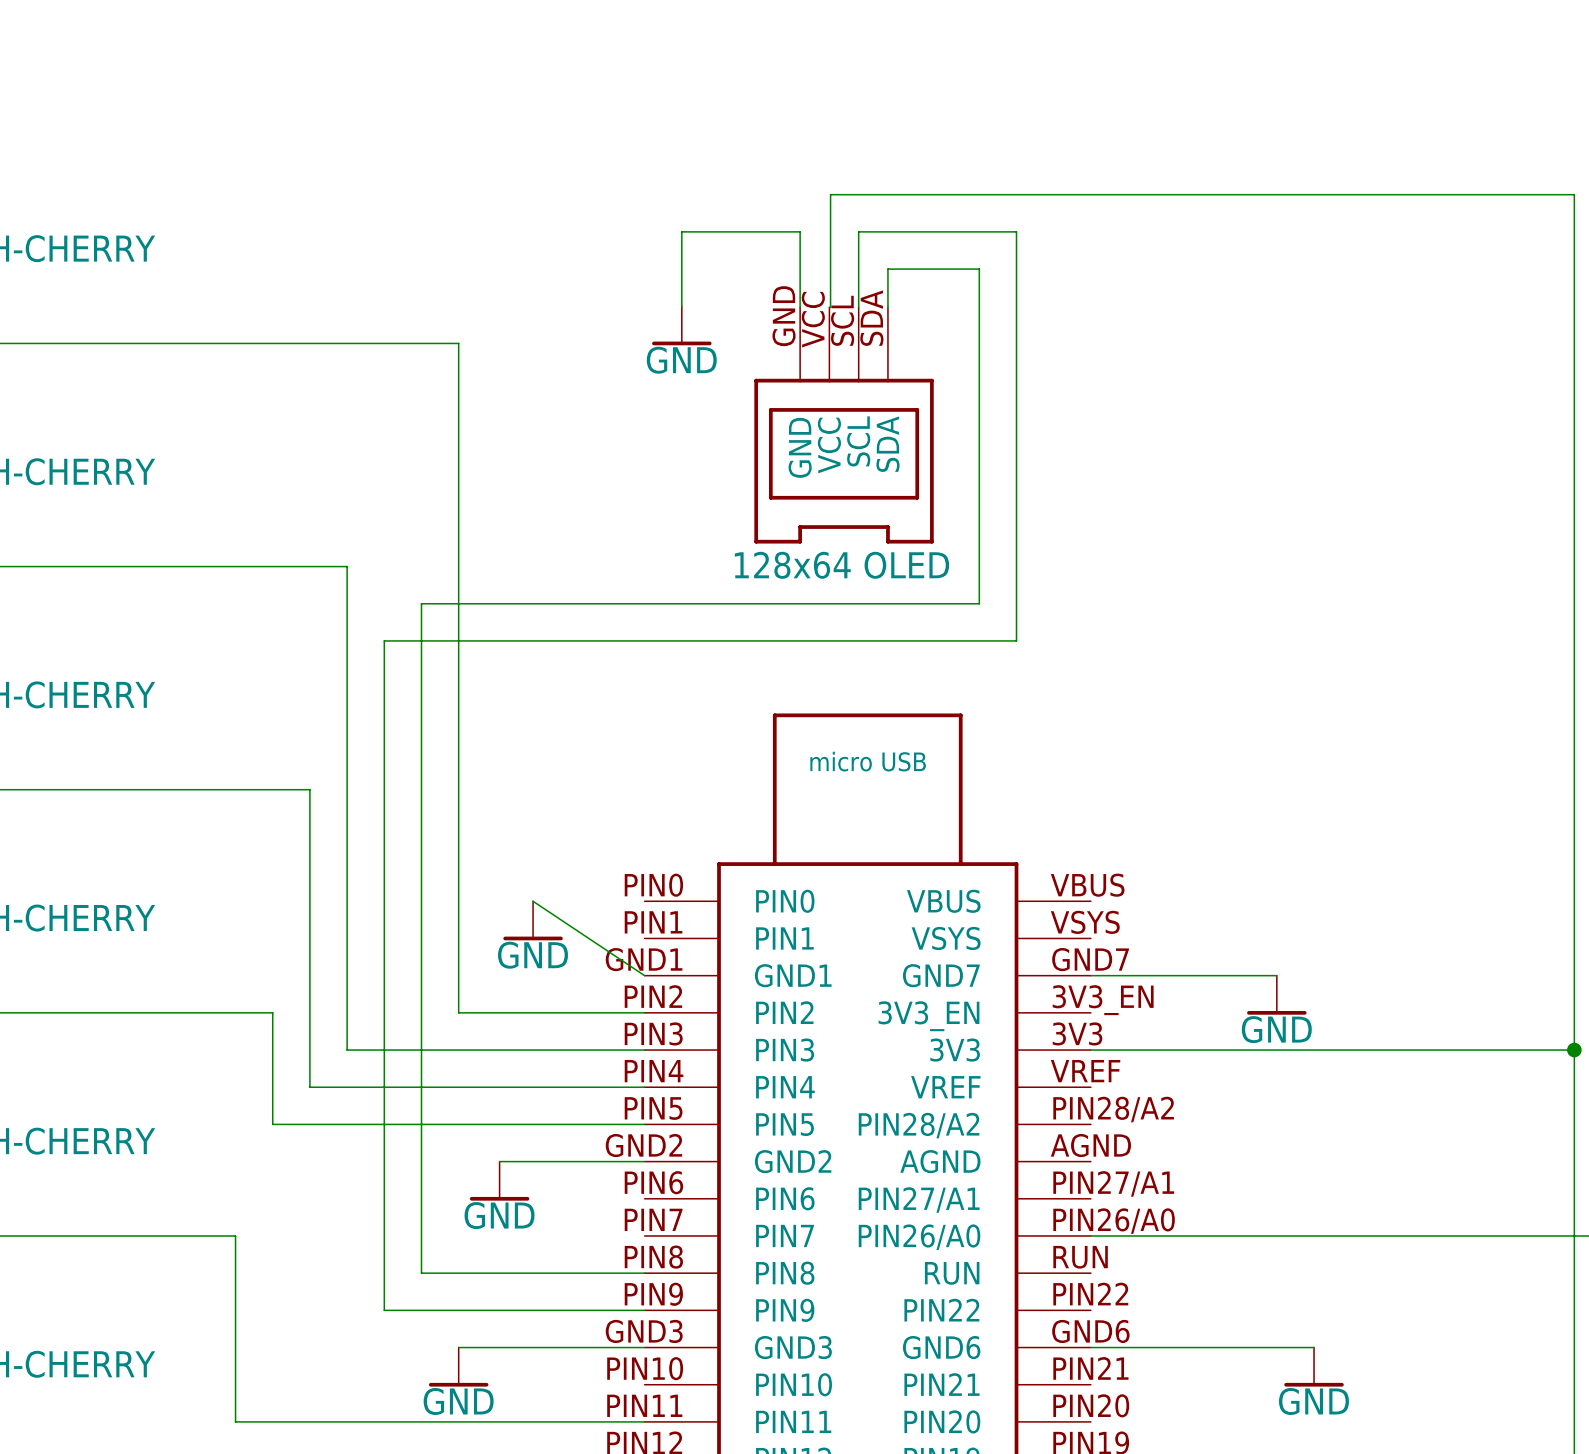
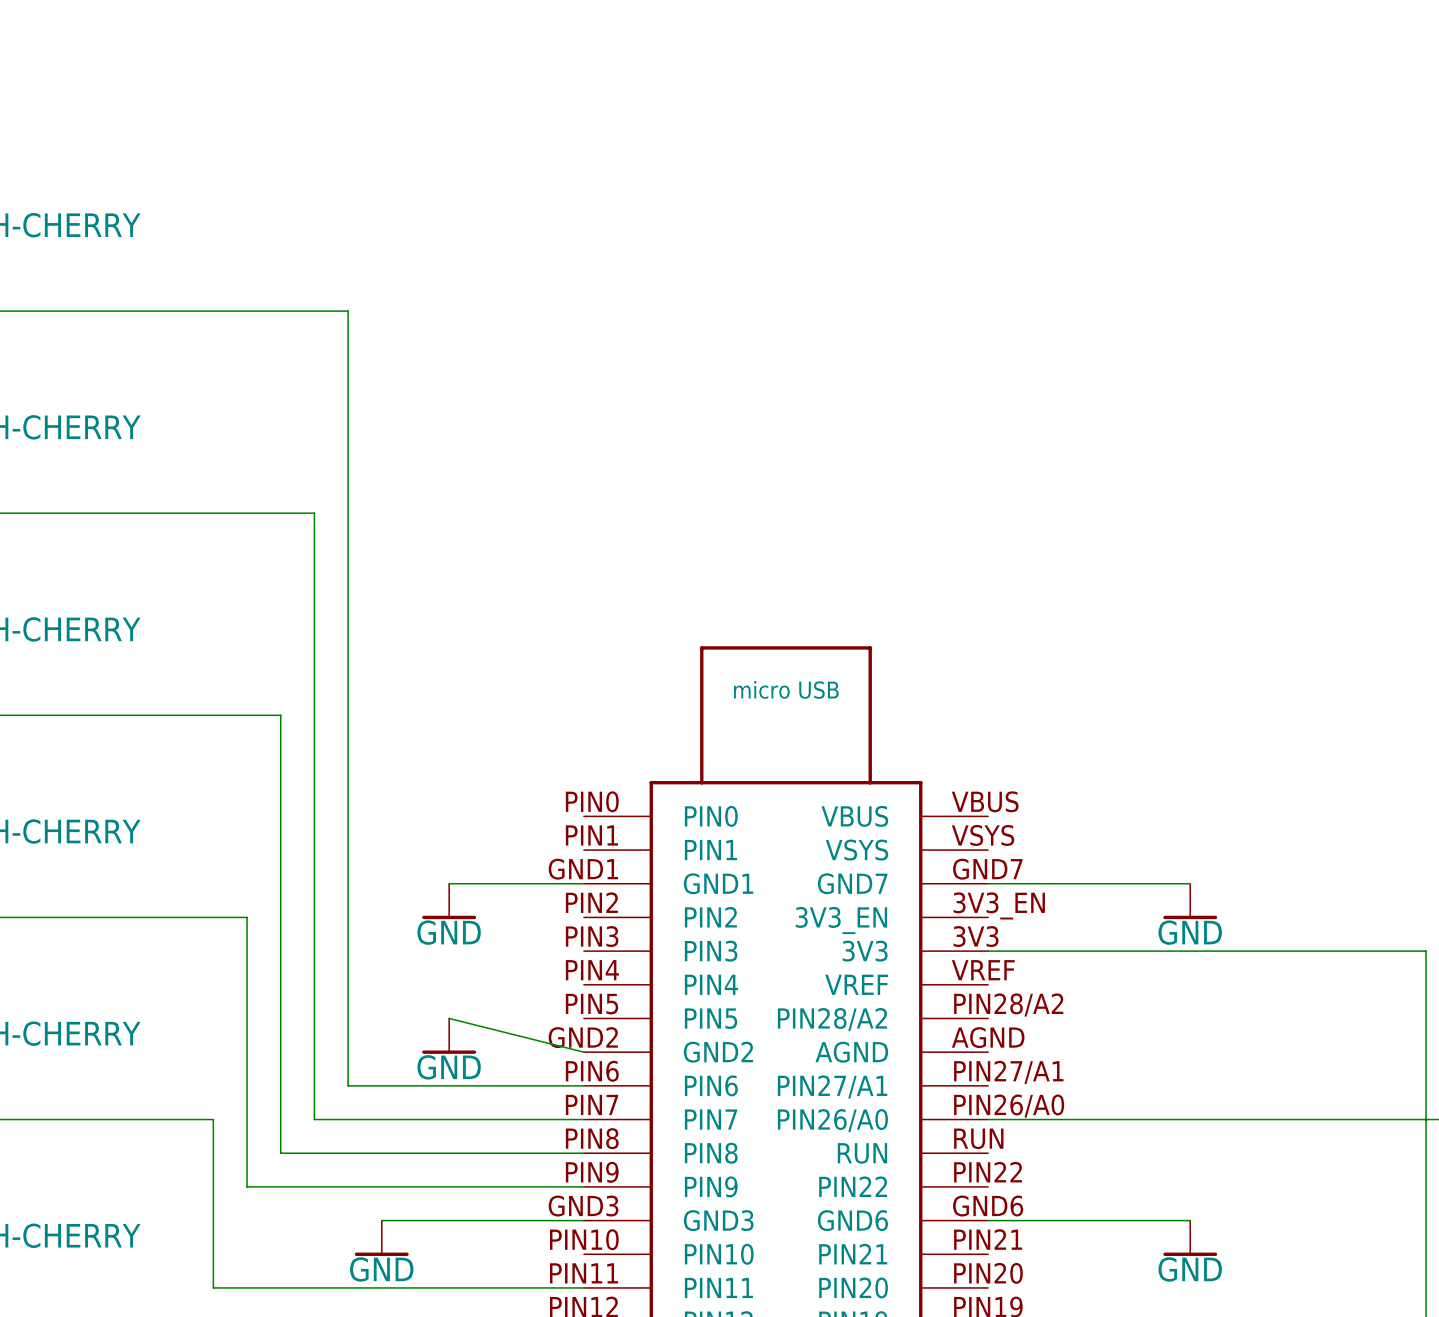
wire: (681, 306) (681, 231) (800, 231) (800, 307) -> none
wire: (829, 307) (830, 194) (1574, 194) (1574, 1050) -> none
wire: (858, 307) (858, 231) (1016, 231) (1016, 640) (384, 640) -> none
wire: (887, 307) (887, 269) (979, 269) (979, 603) (421, 603) (421, 1273) -> none
power symbol: GND (681, 325) -> none
wire: (384, 343) (458, 343) (458, 1012) (644, 1012) -> (348, 311) (348, 580)
part: (844, 425) -> none
wire: (533, 901) (644, 975) -> (449, 883) (583, 883)
power symbol position: GND (533, 920) -> GND (449, 901)
wire: none -> (1156, 883) (1190, 883)
power symbol position: GND (1276, 995) -> GND (1190, 901)
wire: (347, 1050) (644, 1050) -> (314, 951) (314, 1119) (583, 1119)
junction: (1574, 1050) -> none
wire: (309, 1087) (644, 1087) -> (280, 984) (280, 1153) (381, 1153)
wire: (272, 1124) (644, 1124) -> none
wire: (499, 1161) (644, 1161) -> (449, 1018) (583, 1052)
power symbol position: GND (499, 1181) -> GND (449, 1036)
wire: (384, 1198) (384, 1310) -> (247, 1018) (247, 1186) (348, 1186)
wire: none -> (348, 1085) (583, 1085)
wire: none -> (381, 1220) (415, 1220)
power symbol position: GND (458, 1367) -> GND (381, 1238)

